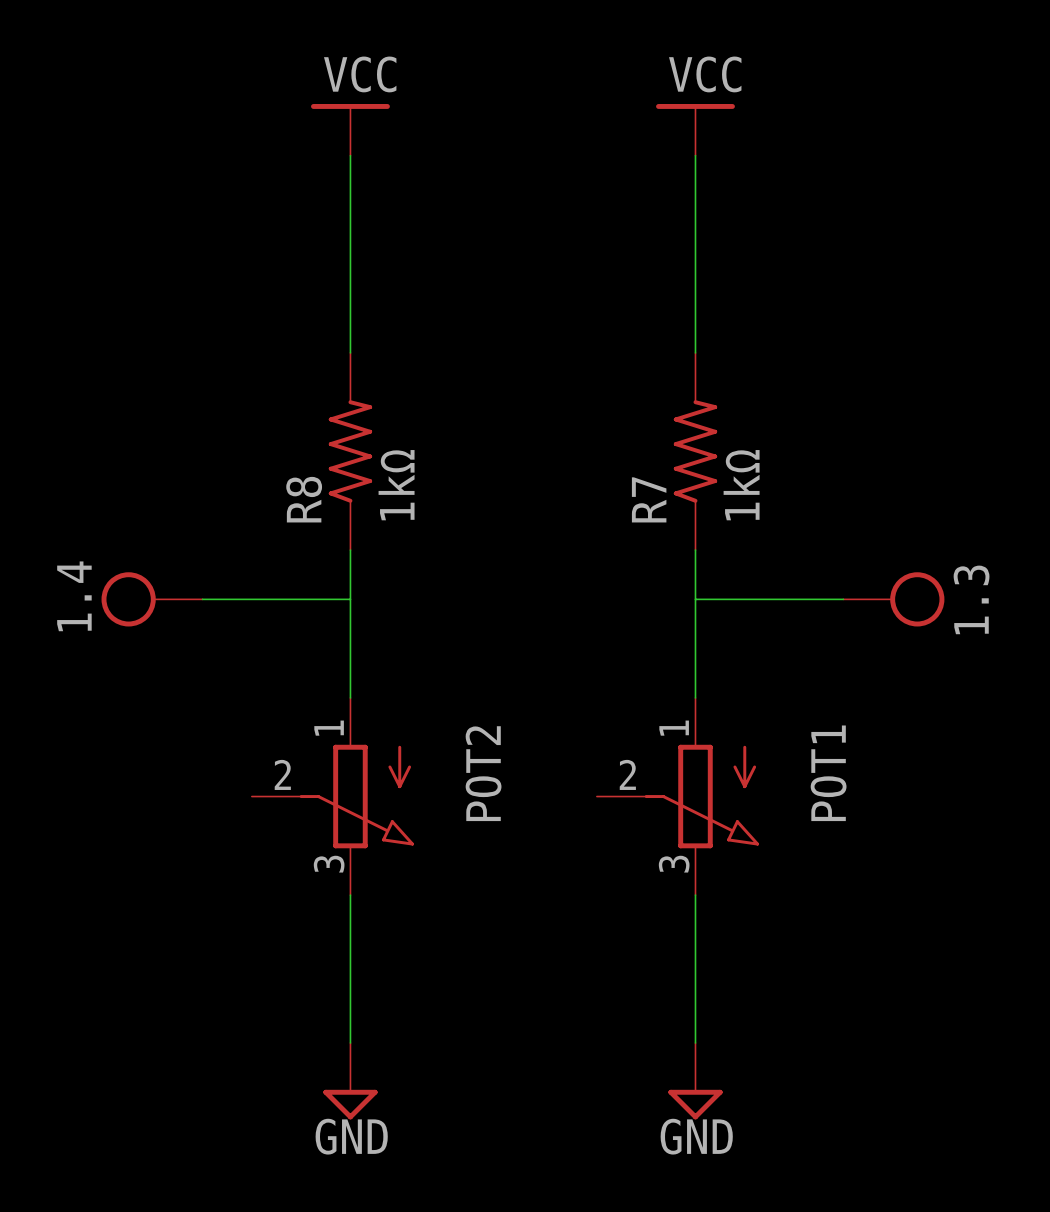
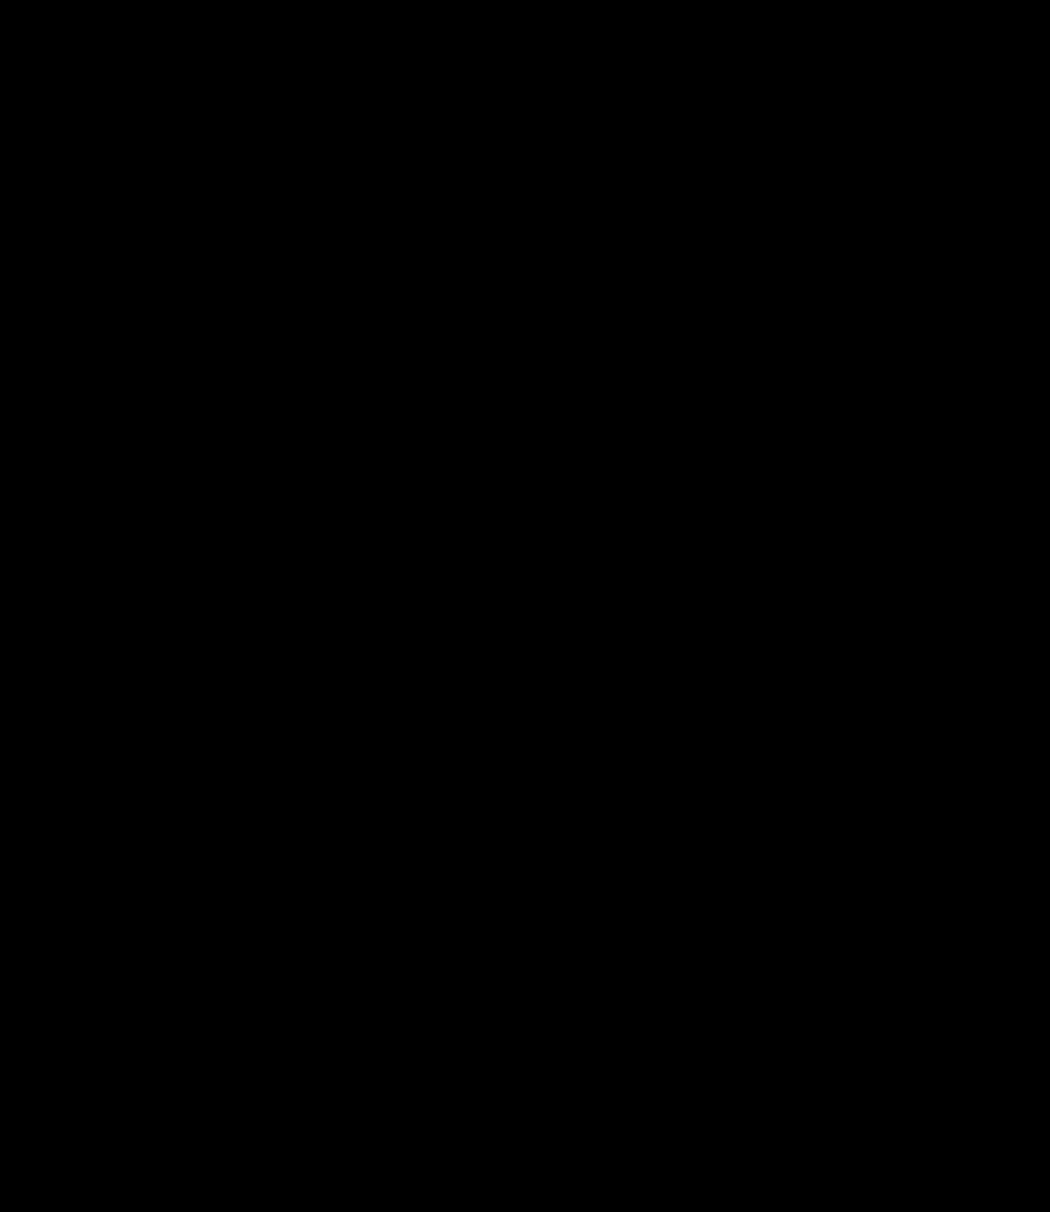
power symbol: VCC (350, 129) -> none
power symbol: VCC (695, 129) -> none
wire: (350, 155) (350, 352) -> none
wire: (695, 155) (695, 352) -> none
R8: 1kΩ (350, 451) -> none
R7: 1kΩ (695, 451) -> none
wire: (350, 550) (350, 697) -> none
wire: (695, 550) (695, 697) -> none
power symbol: 1.4 (152, 599) -> none
wire: (202, 599) (350, 599) -> none
wire: (695, 599) (843, 599) -> none
power symbol: 1.3 (893, 599) -> none
POT2: (332, 796) -> none
POT1: (677, 796) -> none
wire: (350, 895) (350, 1042) -> none
wire: (695, 895) (695, 1042) -> none
power symbol: GND (350, 1081) -> none
power symbol: GND (695, 1081) -> none

